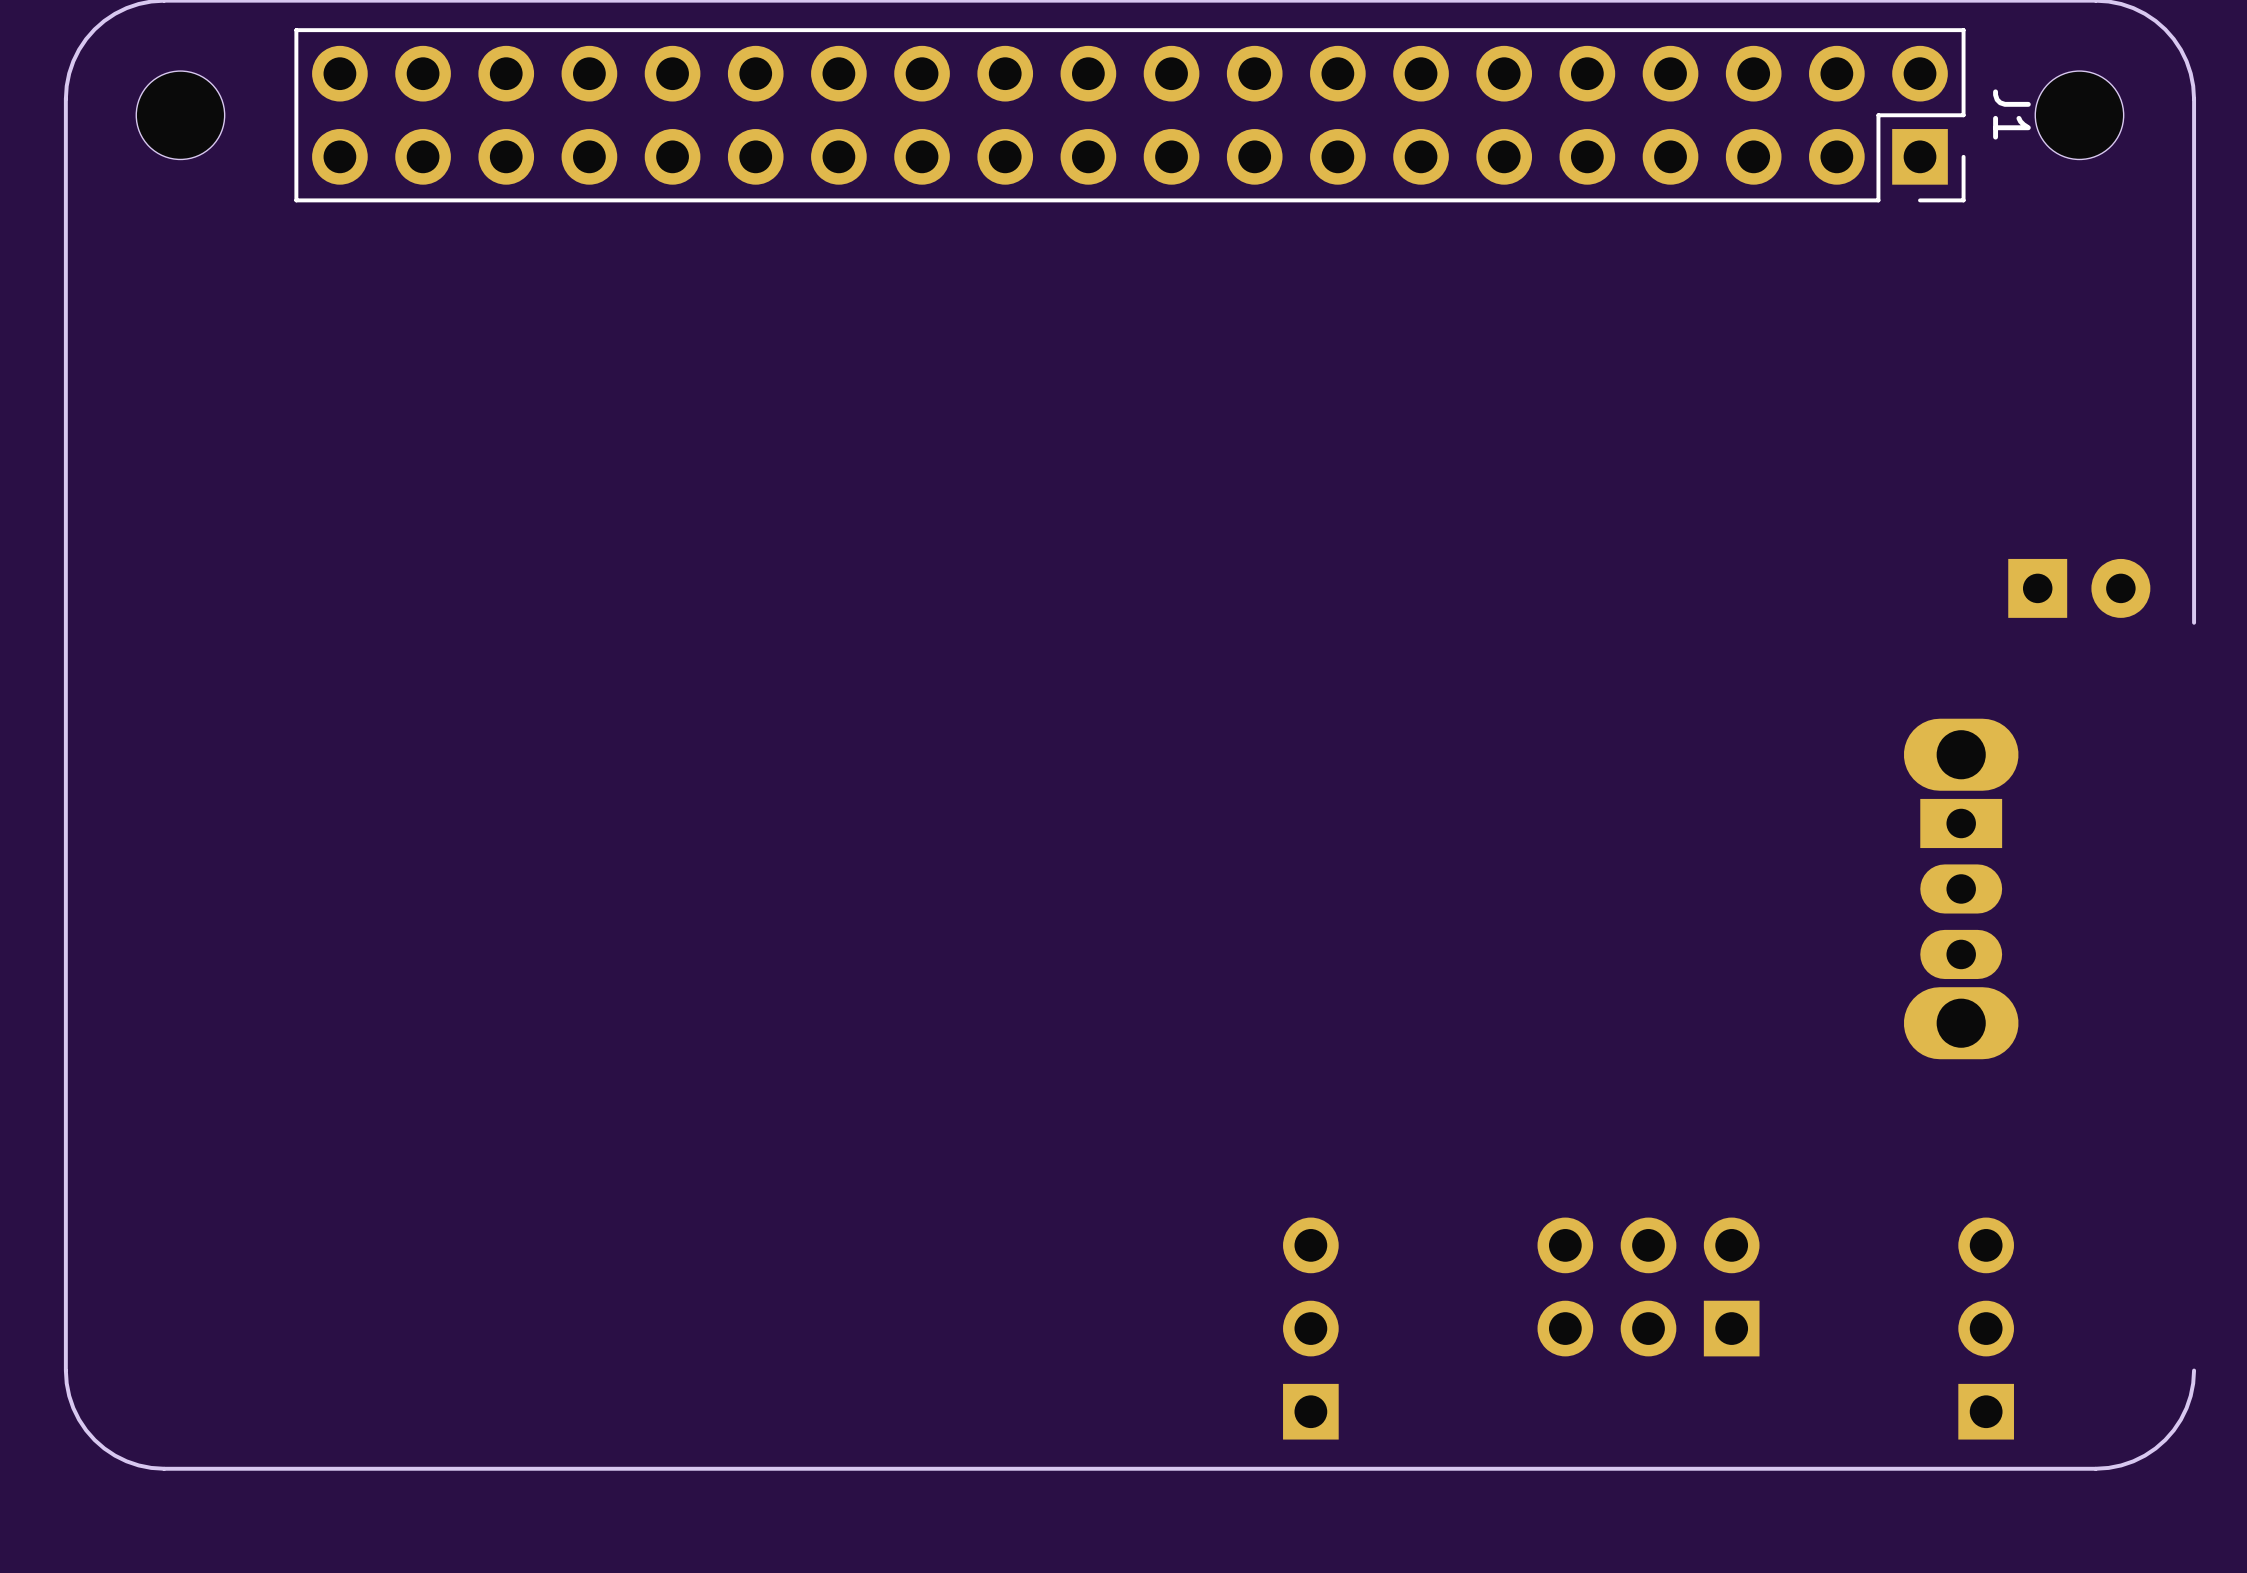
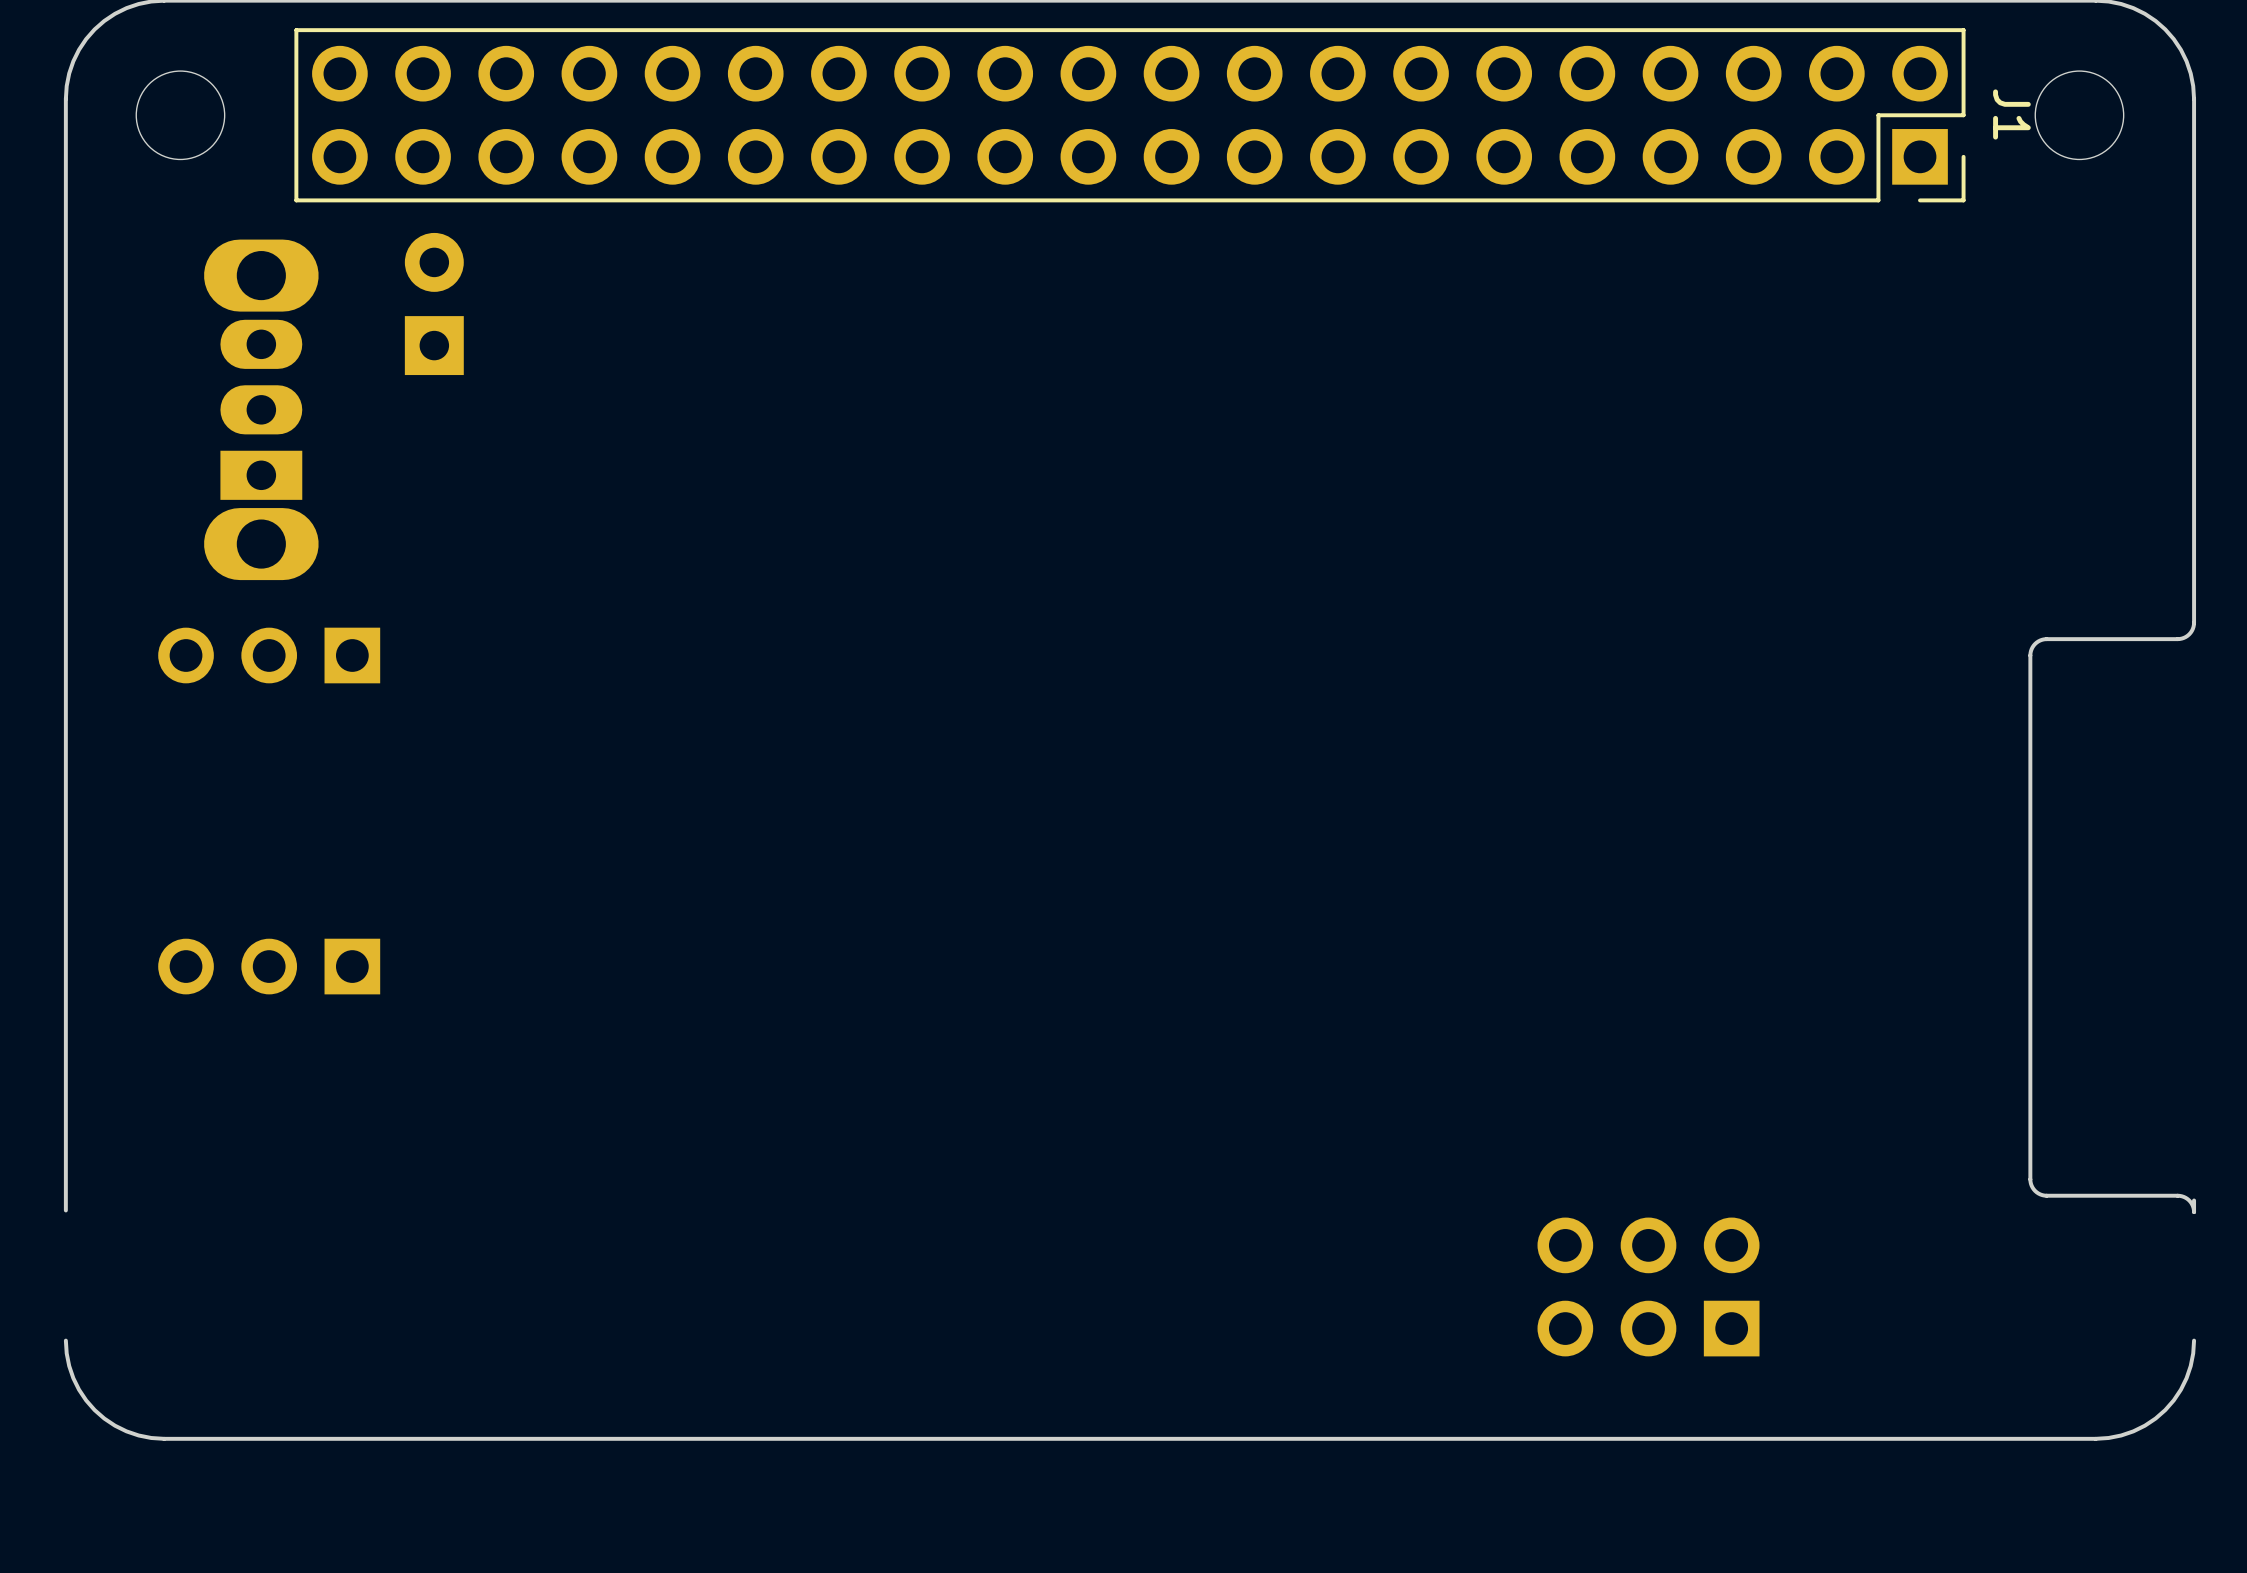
part: none -> (434, 303)
part: none -> (261, 409)
part: (2079, 588) -> none
board edge: none -> (2194, 622) (2190, 632) (2179, 638) (2042, 639) (2033, 645) (2030, 655) (2030, 1183) (2035, 1190) (2044, 1195) (2179, 1195) (2189, 1200) (2194, 1212) (2194, 1200)
part: none -> (269, 655)
part: (1961, 888) -> none
part: none -> (269, 966)
board edge: (65, 1210) (65, 1370) -> none
part: (1310, 1328) -> none
part: (1986, 1328) -> none
board edge: (2194, 1370) (2193, 1383) (2186, 1408) (2180, 1419) (2165, 1440) (2155, 1448) (2133, 1461) (2108, 1467) (2095, 1468) (164, 1468) (151, 1467) (126, 1461) (104, 1448) (94, 1440) (79, 1419) (73, 1408) (66, 1383) (65, 1370) -> (2194, 1340) (2193, 1353) (2186, 1378) (2180, 1389) (2165, 1410) (2155, 1418) (2133, 1431) (2121, 1435) (2095, 1438) (164, 1438) (151, 1437) (126, 1431) (104, 1418) (94, 1410) (86, 1400) (73, 1378) (69, 1366) (65, 1340)

